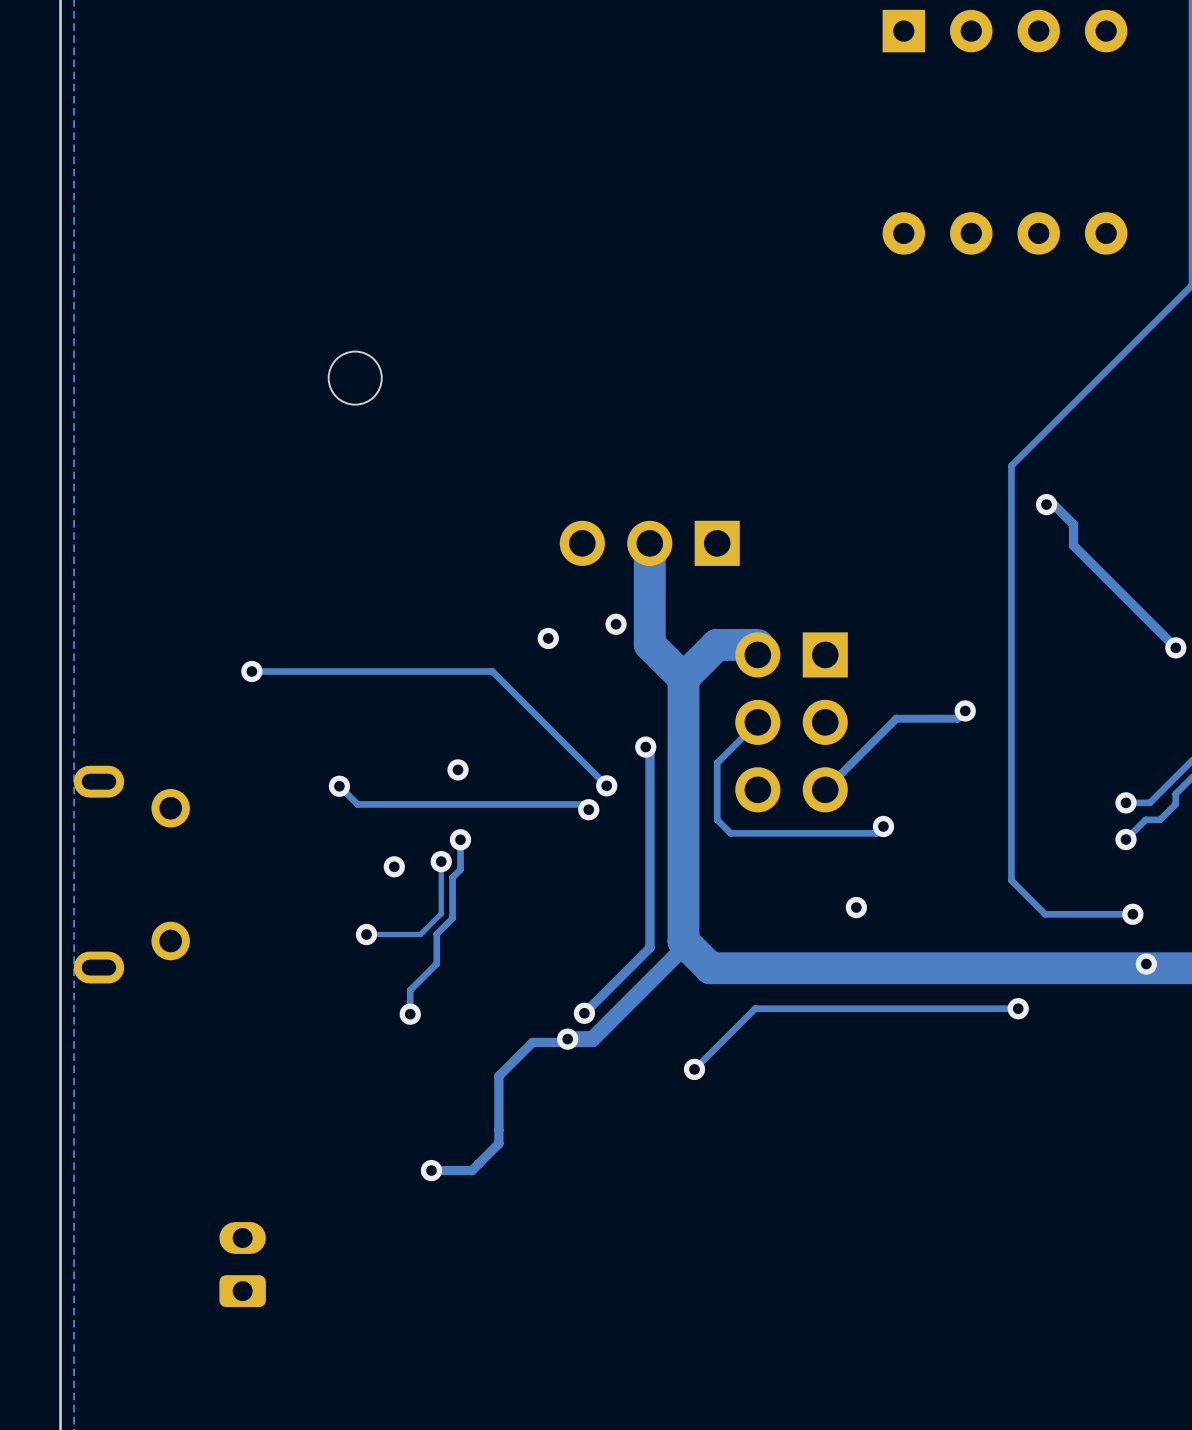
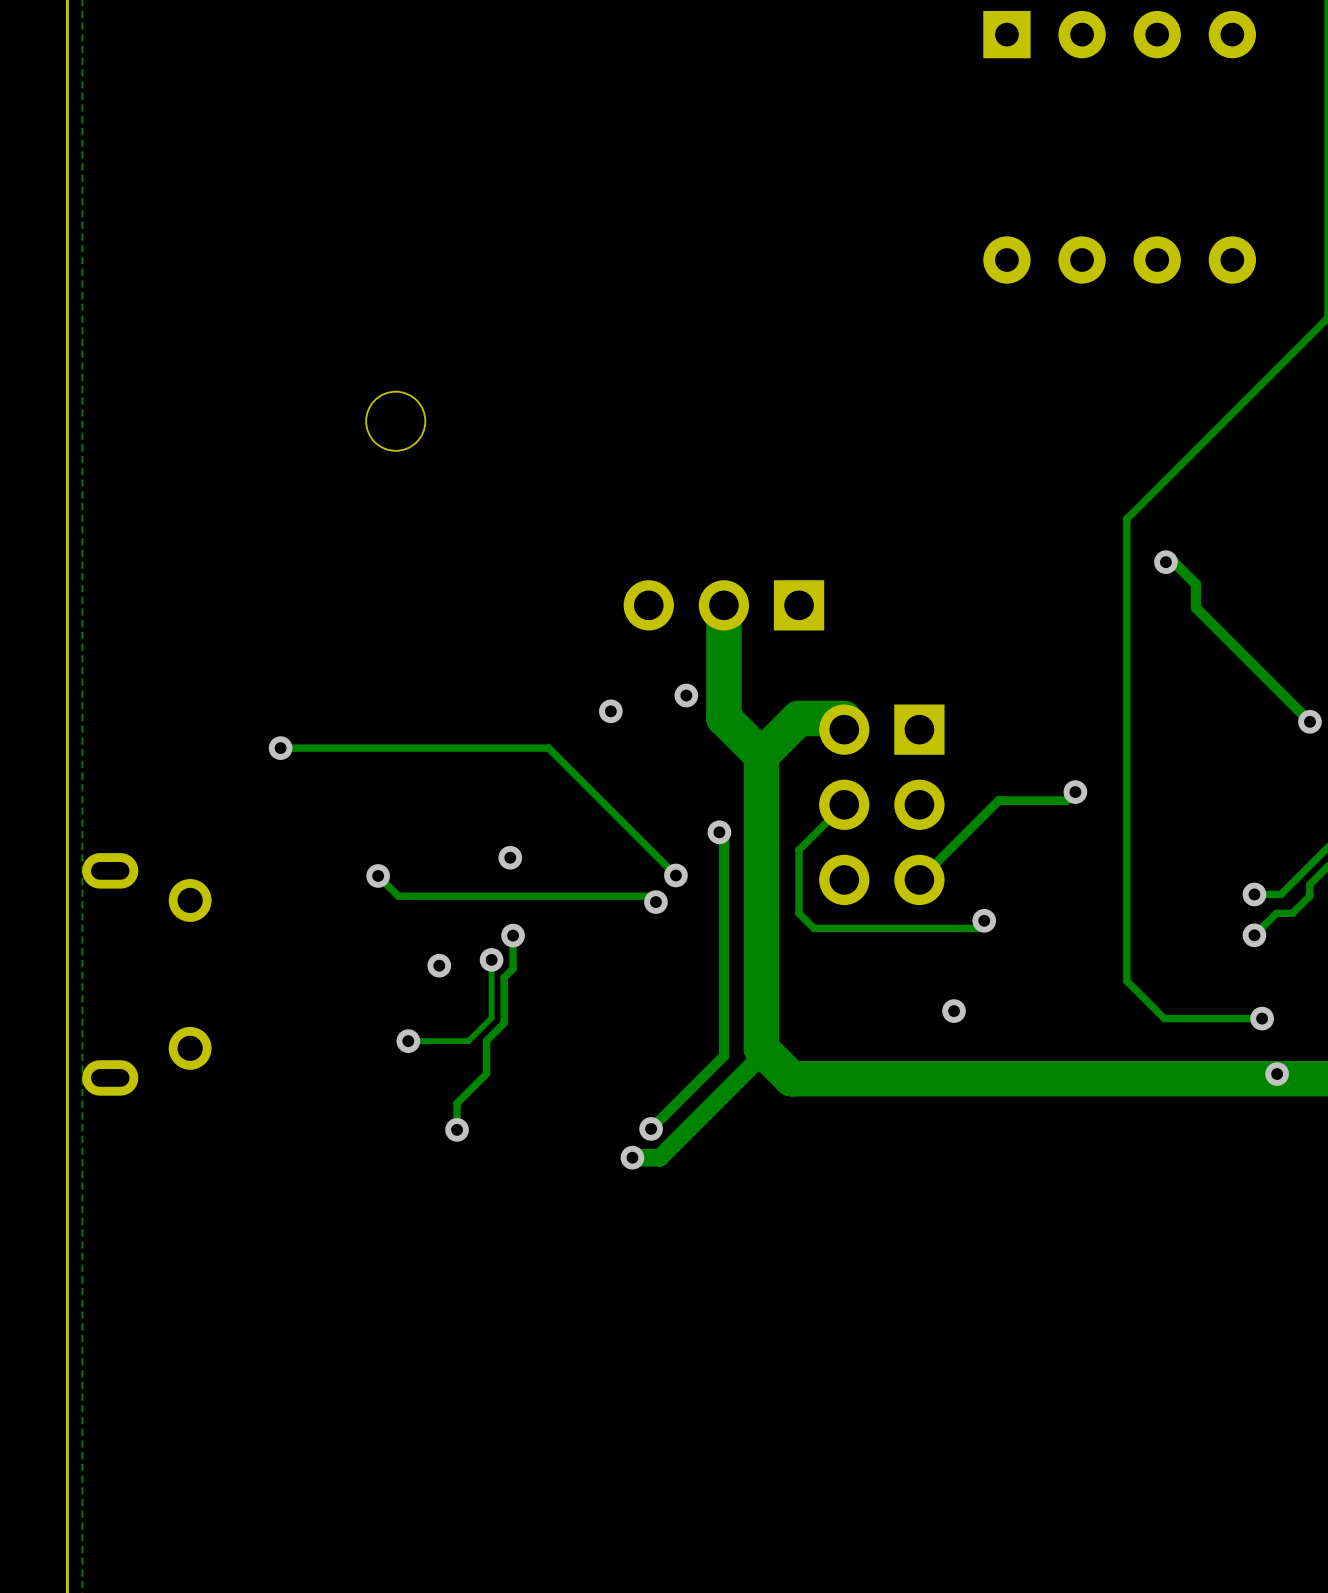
track: (1018, 1008) (755, 1008) (694, 1069) -> none
via: (1018, 1008) -> none
track: (567, 1039) (564, 1042) (532, 1042) (498, 1076) (498, 1143) (471, 1170) (431, 1170) -> none
via: (694, 1069) -> none
via: (431, 1170) -> none
part: (242, 1264) -> none

